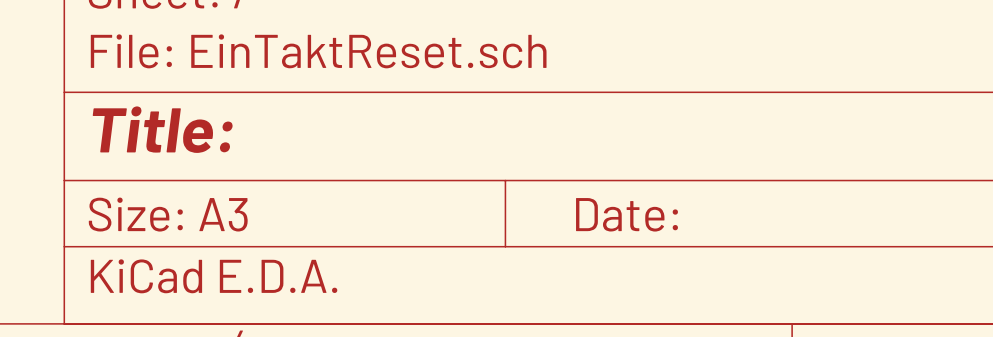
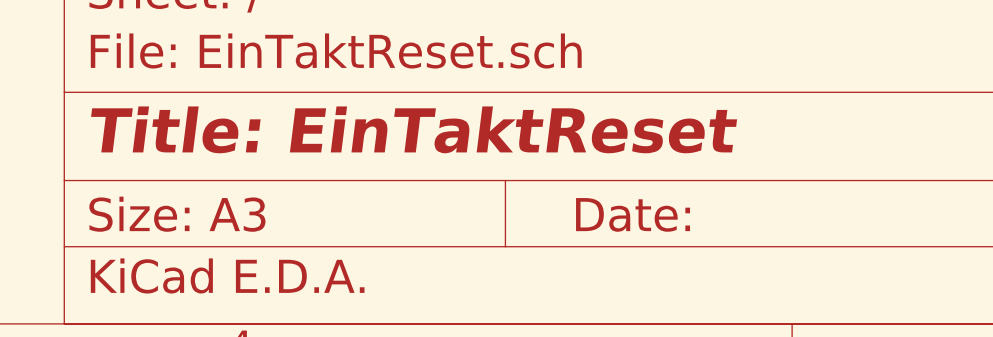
title block: Title: (162, 129) -> Title: EinTaktReset (414, 129)

